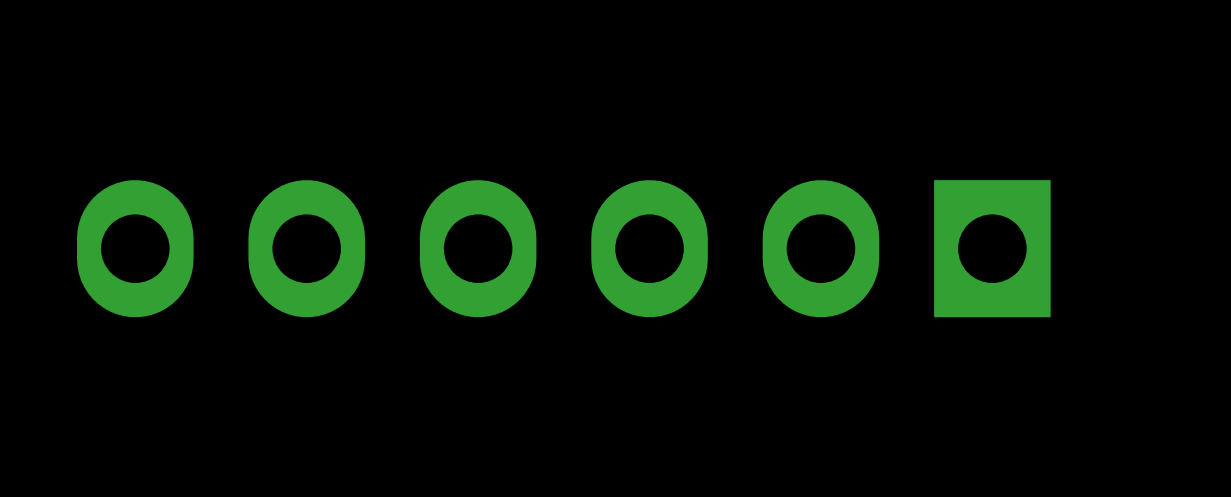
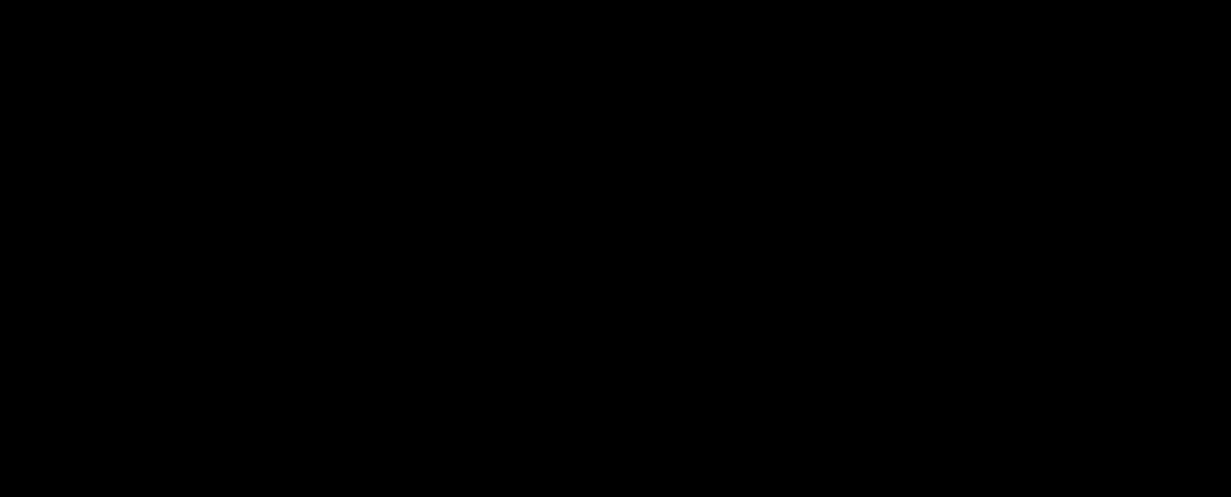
part: (563, 248) -> none

